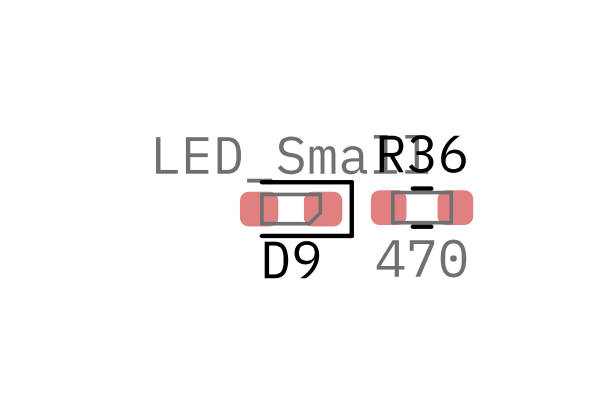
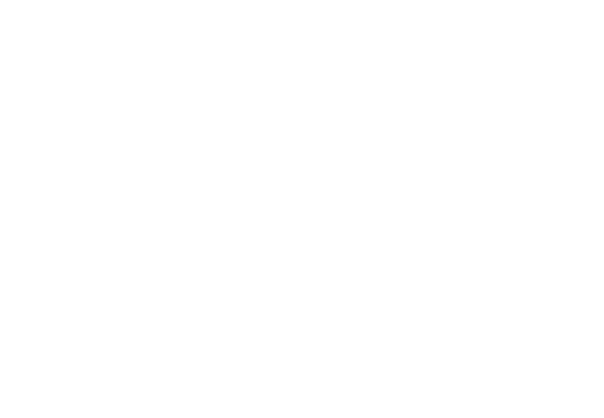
R36: 470 (422, 207) -> none
D9: LED_Small (296, 209) -> none

